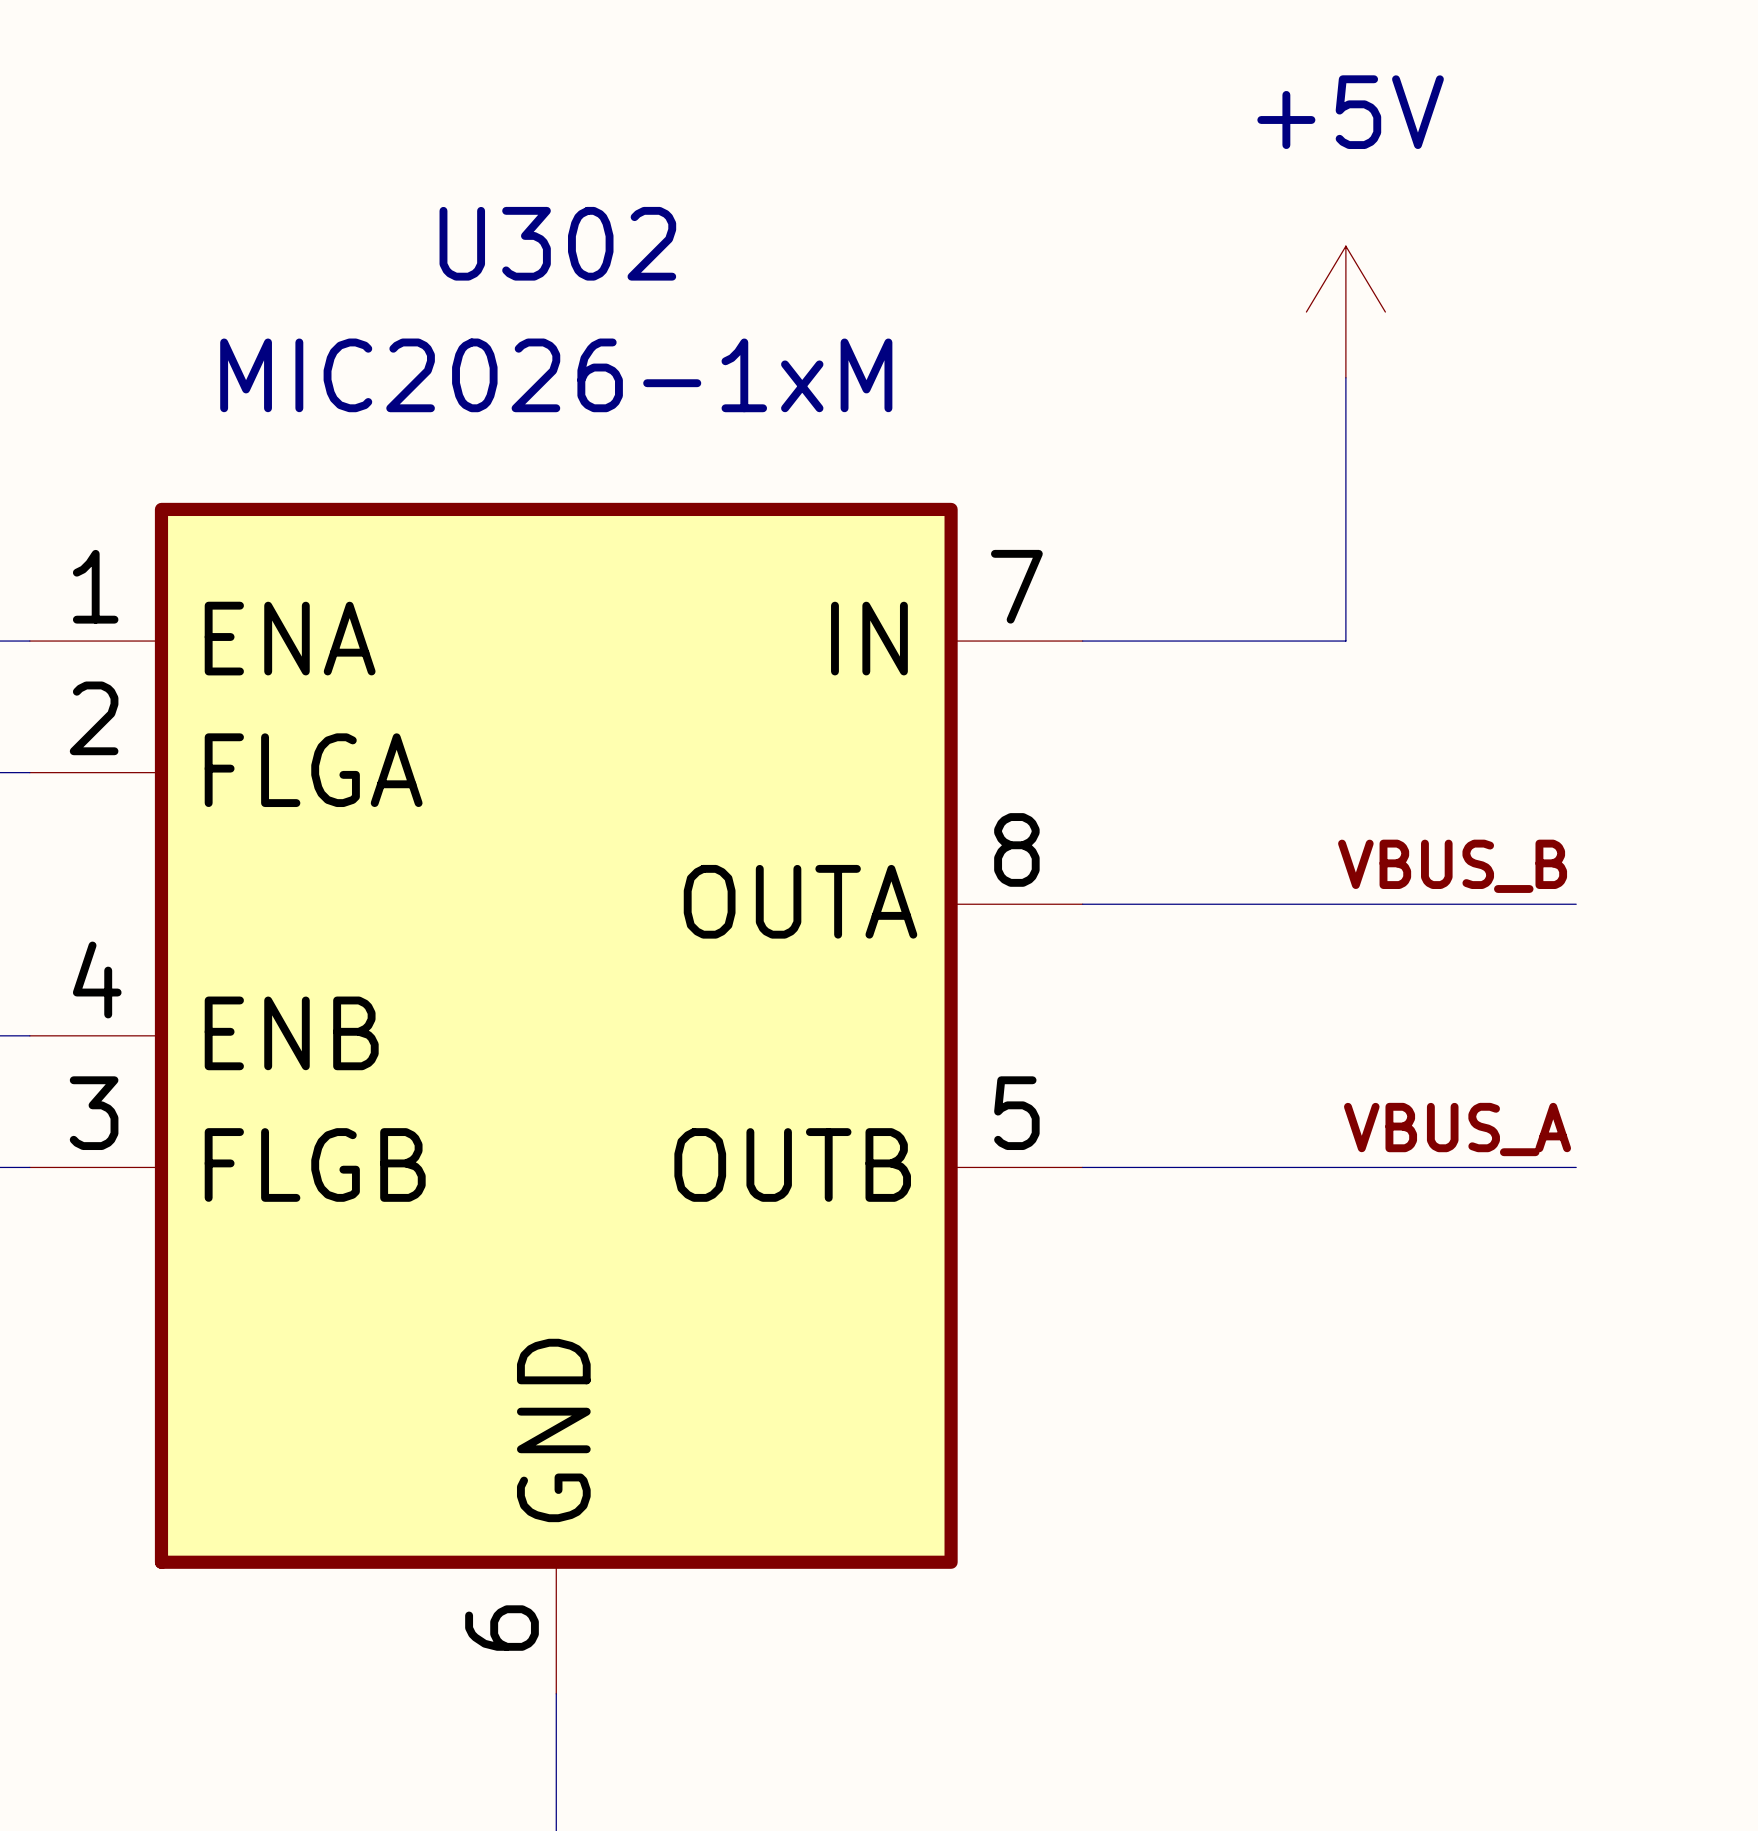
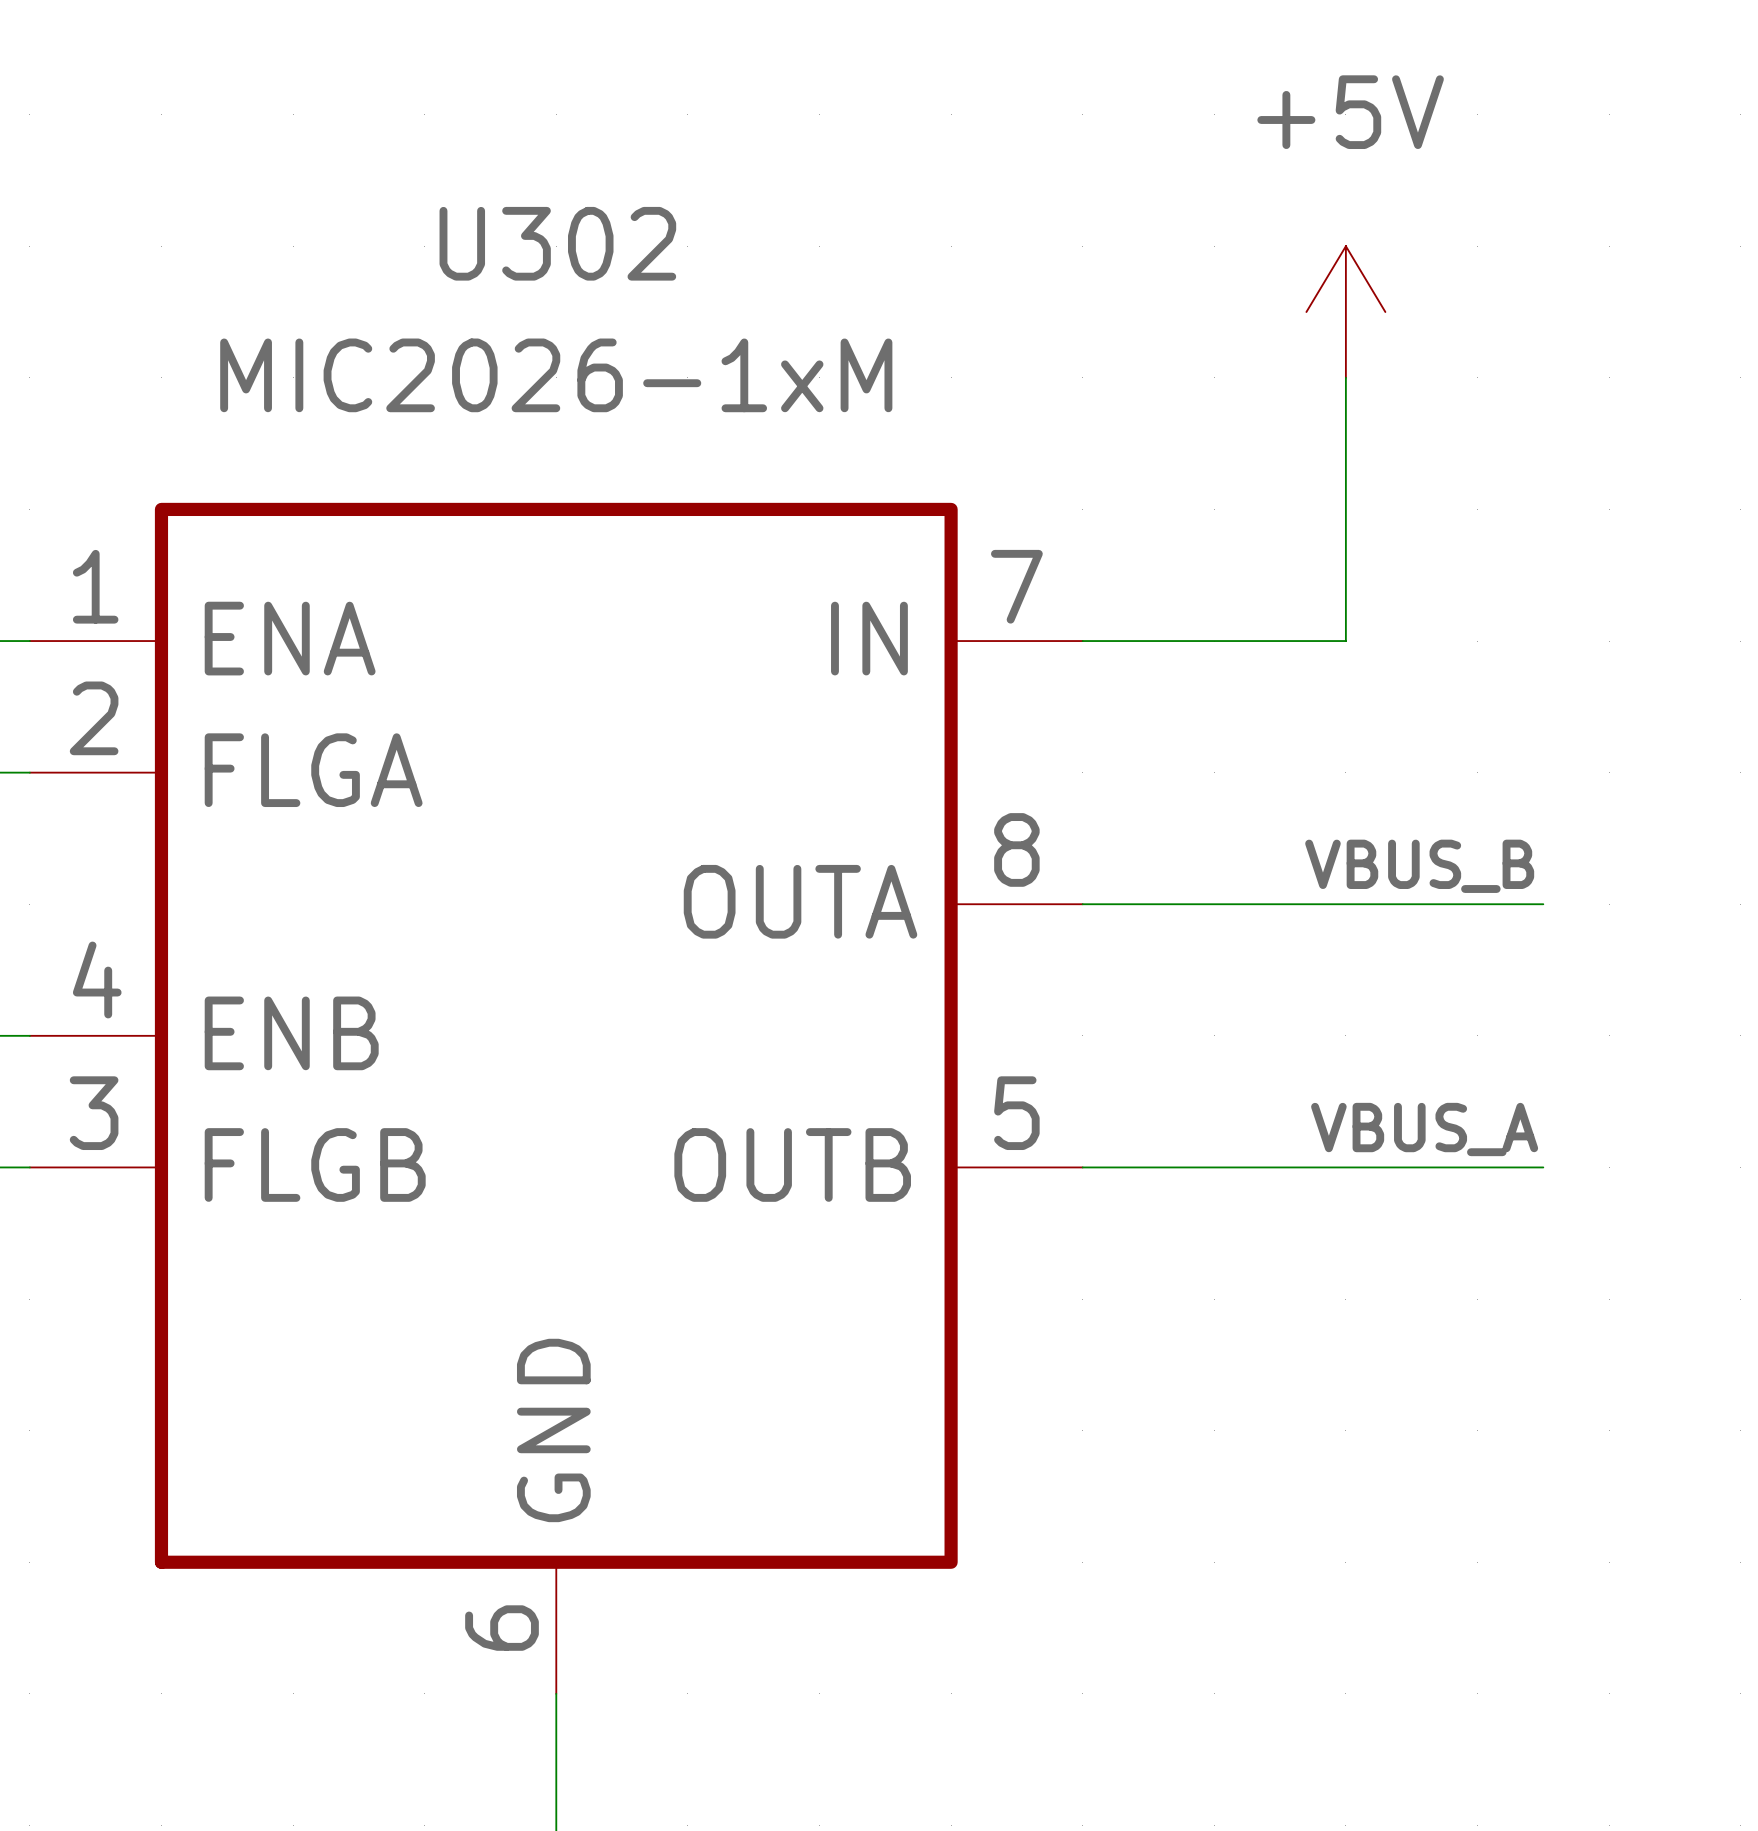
label position: VBUS_B (1452, 866) -> VBUS_B (1419, 866)
wire: (1543, 904) (1576, 904) -> none
label position: VBUS_A (1457, 1129) -> VBUS_A (1424, 1129)
wire: (1543, 1167) (1576, 1167) -> none

